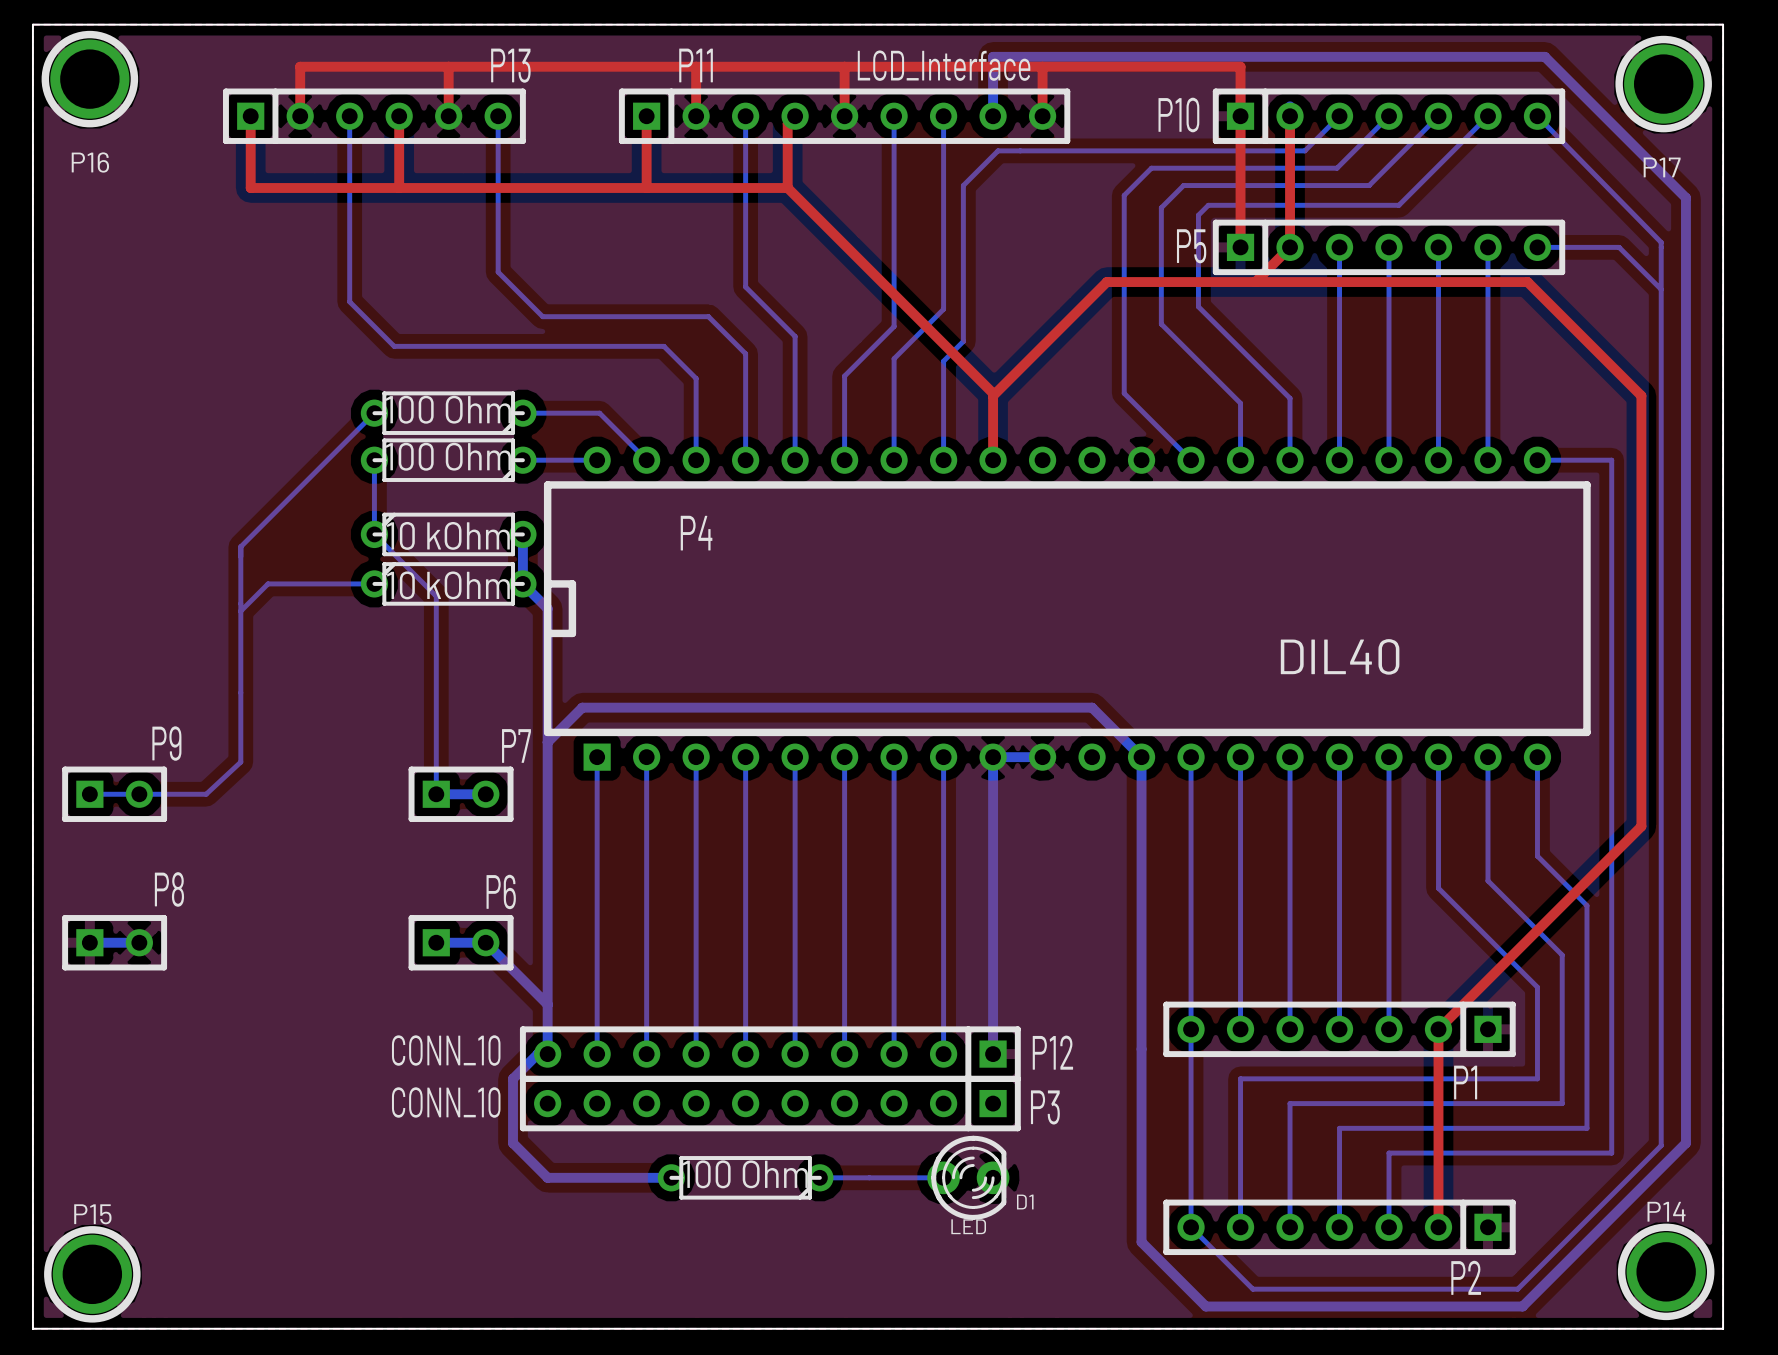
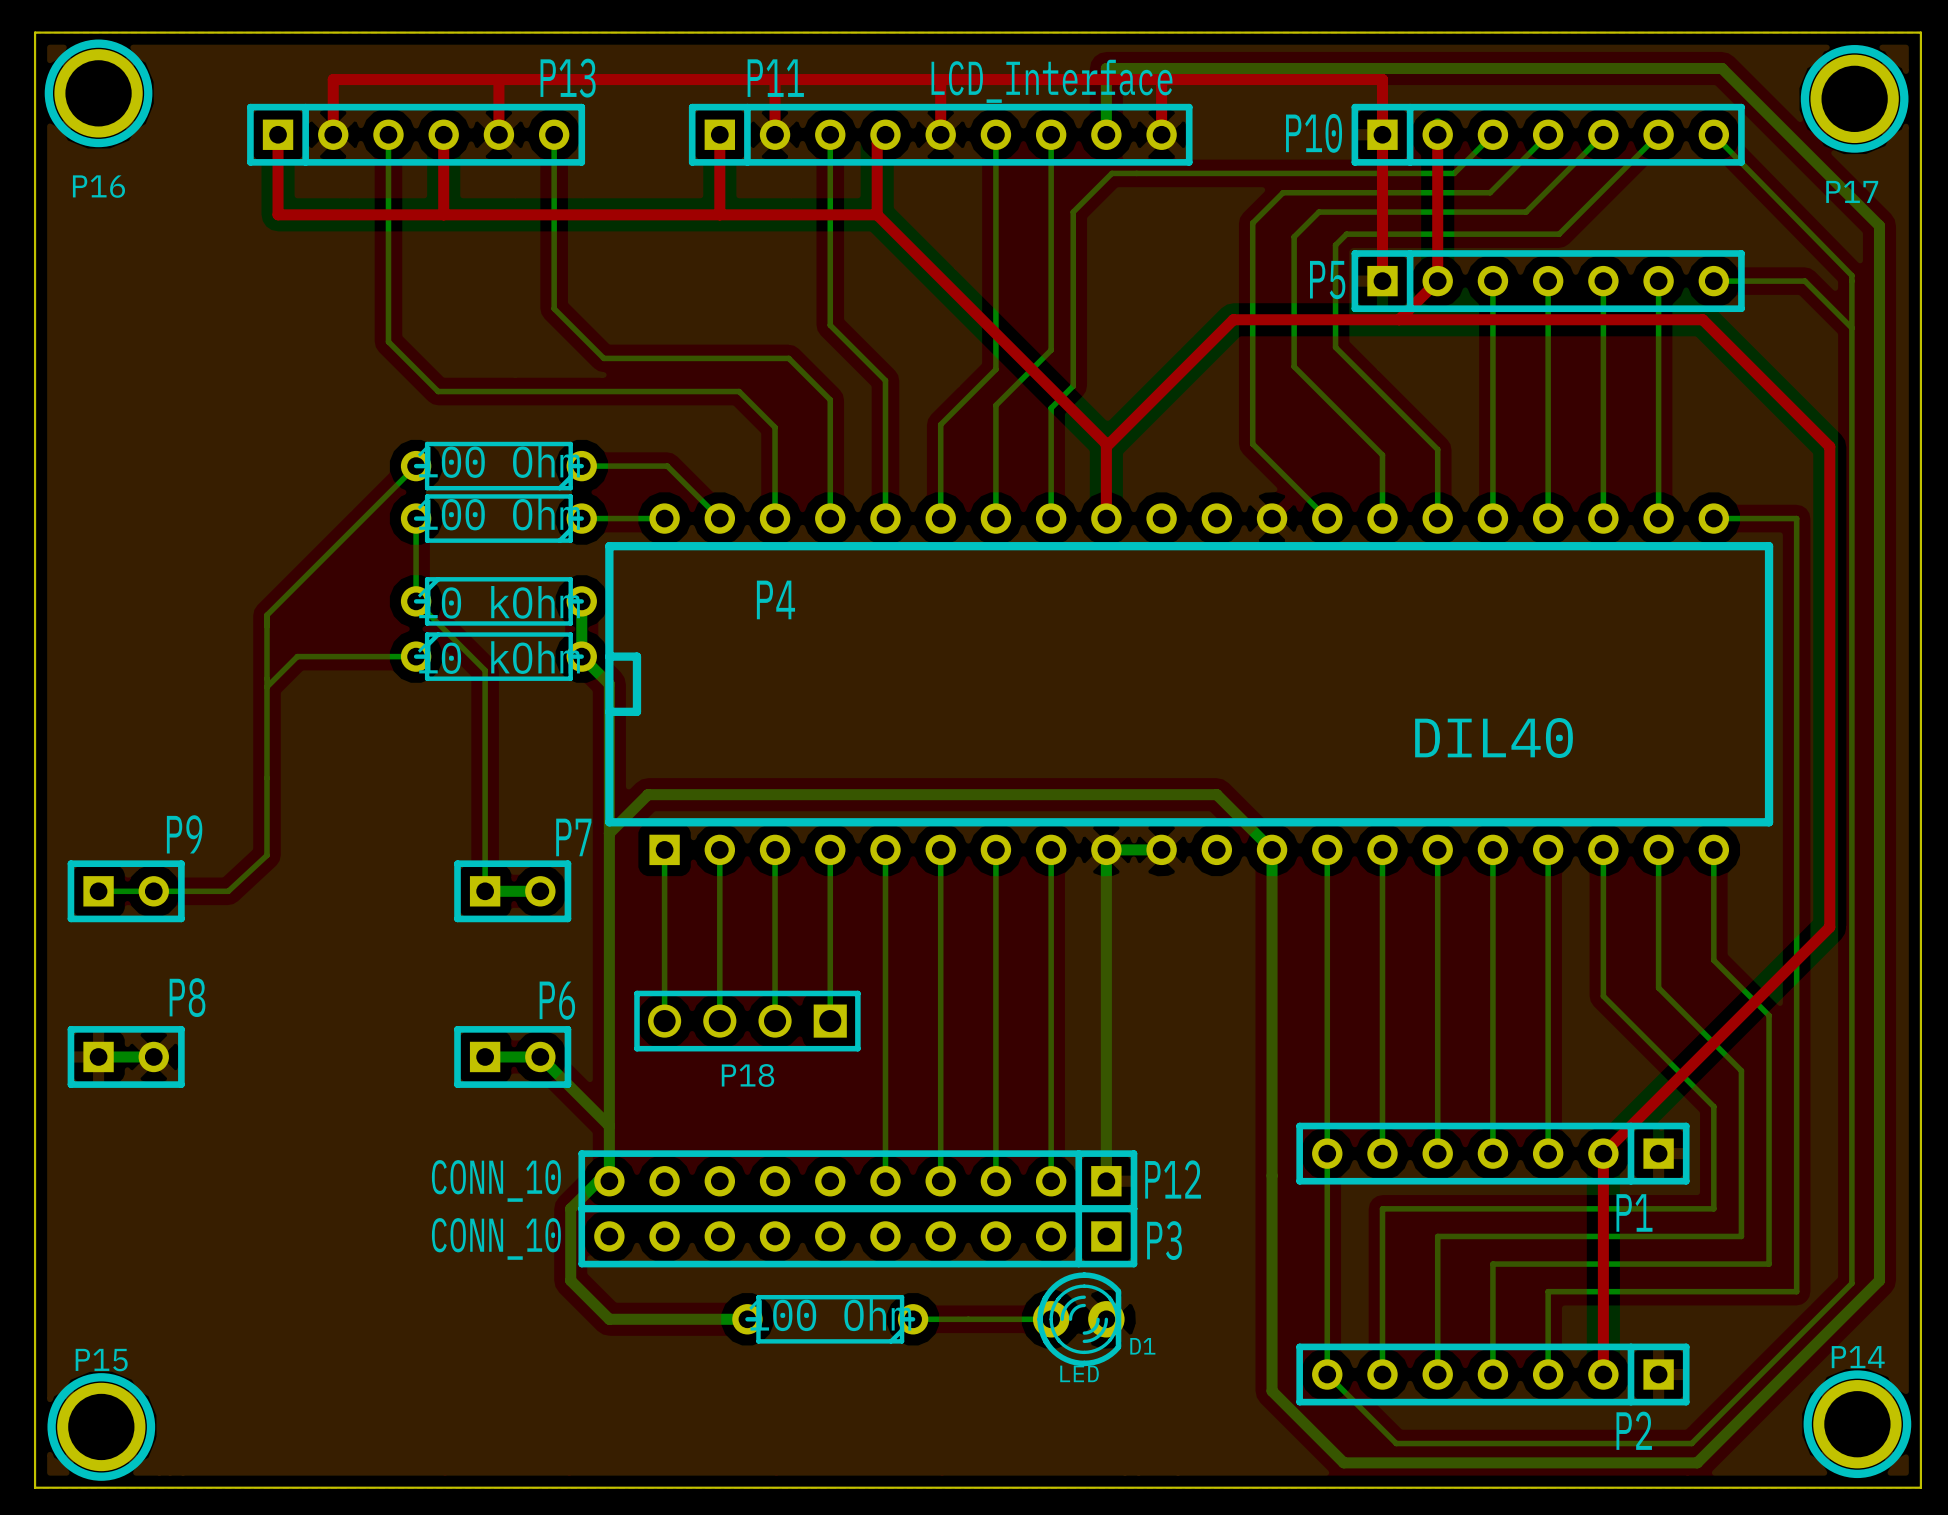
bottom track: (597, 910) (597, 1054) -> none
bottom track: (646, 910) (646, 1054) -> none
P18: none -> (747, 1021)
bottom track: (696, 910) (696, 1054) -> none
bottom track: (745, 910) (745, 1054) -> none

